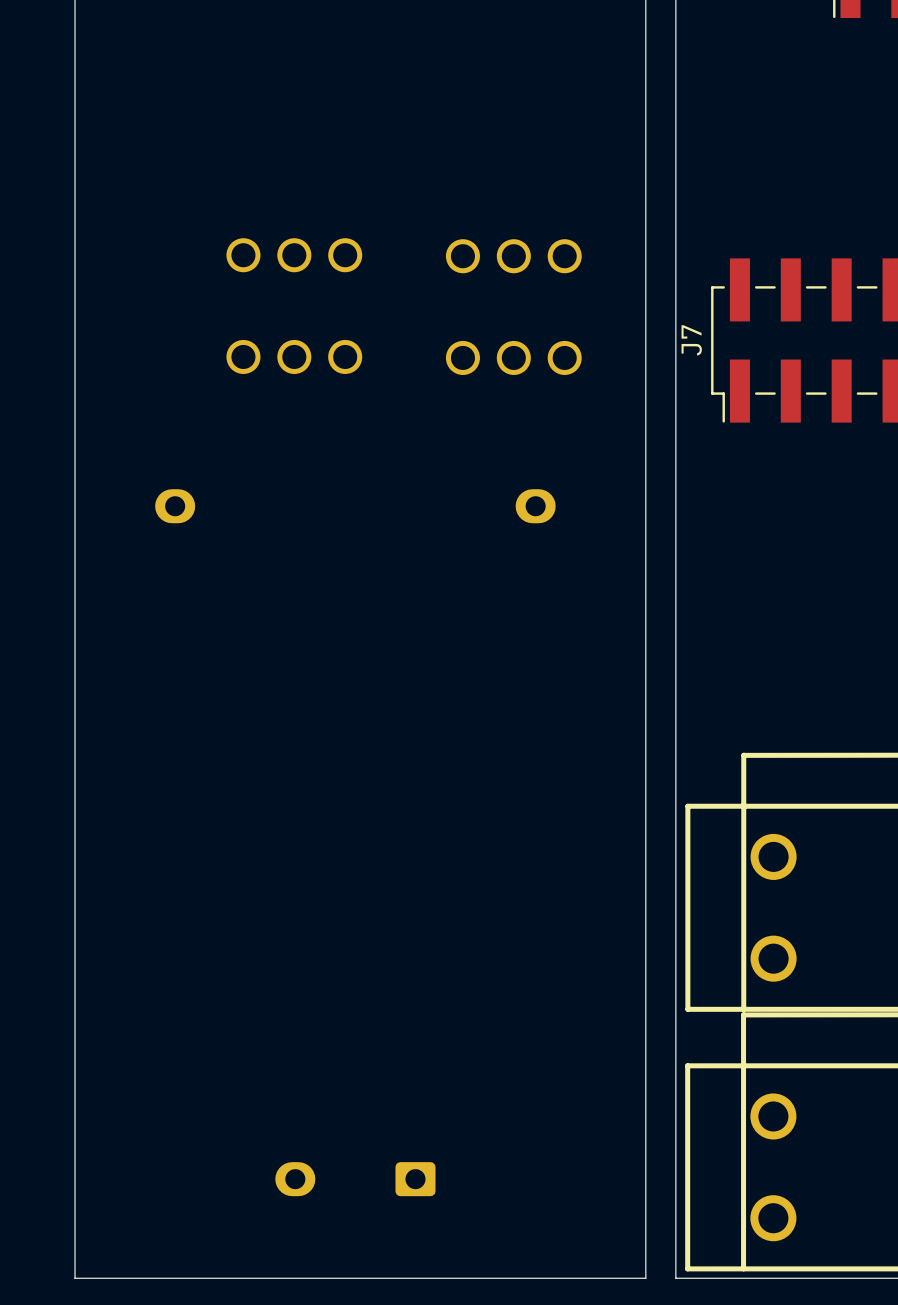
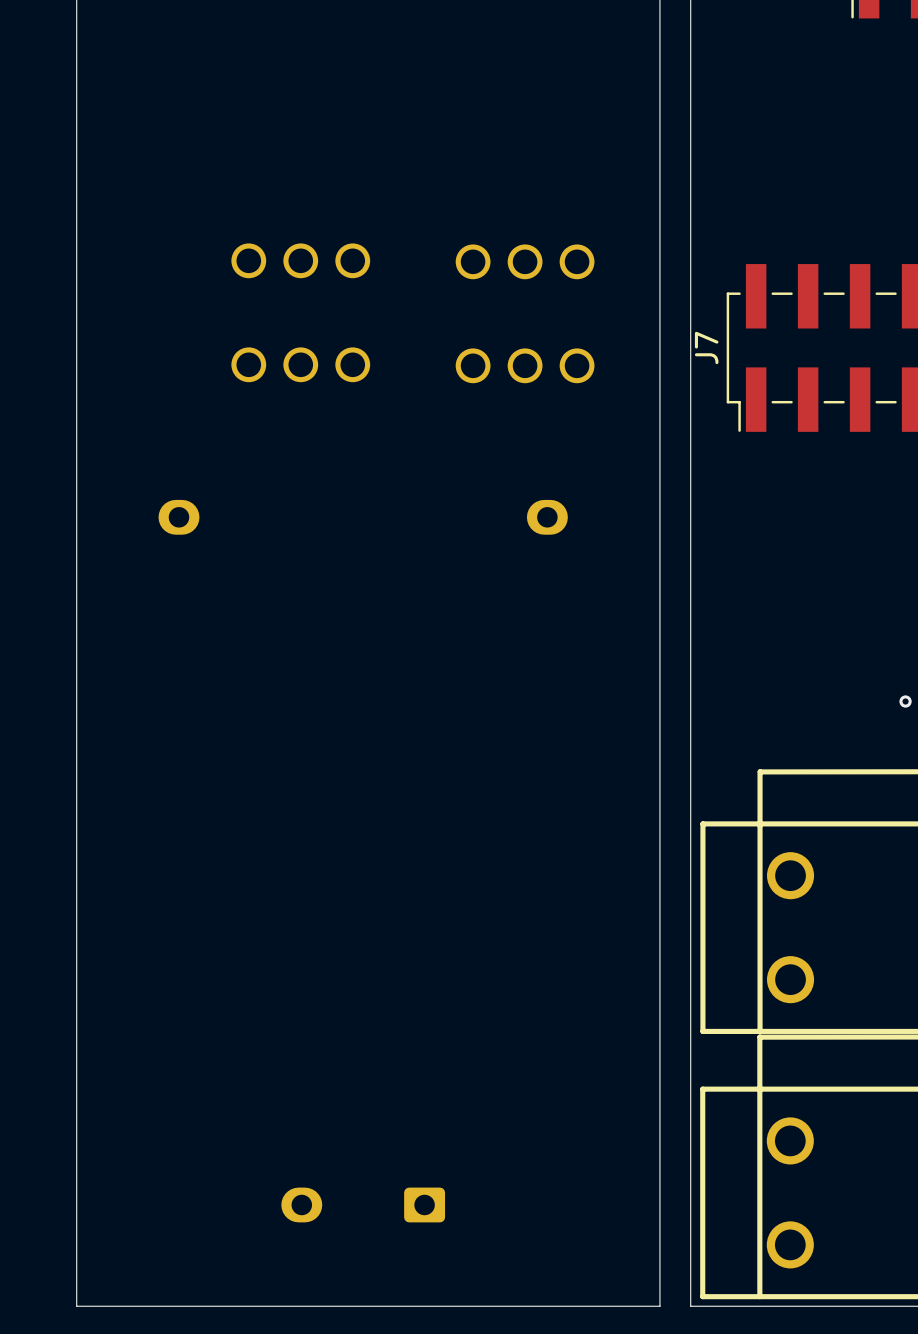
via: none -> (905, 701)

